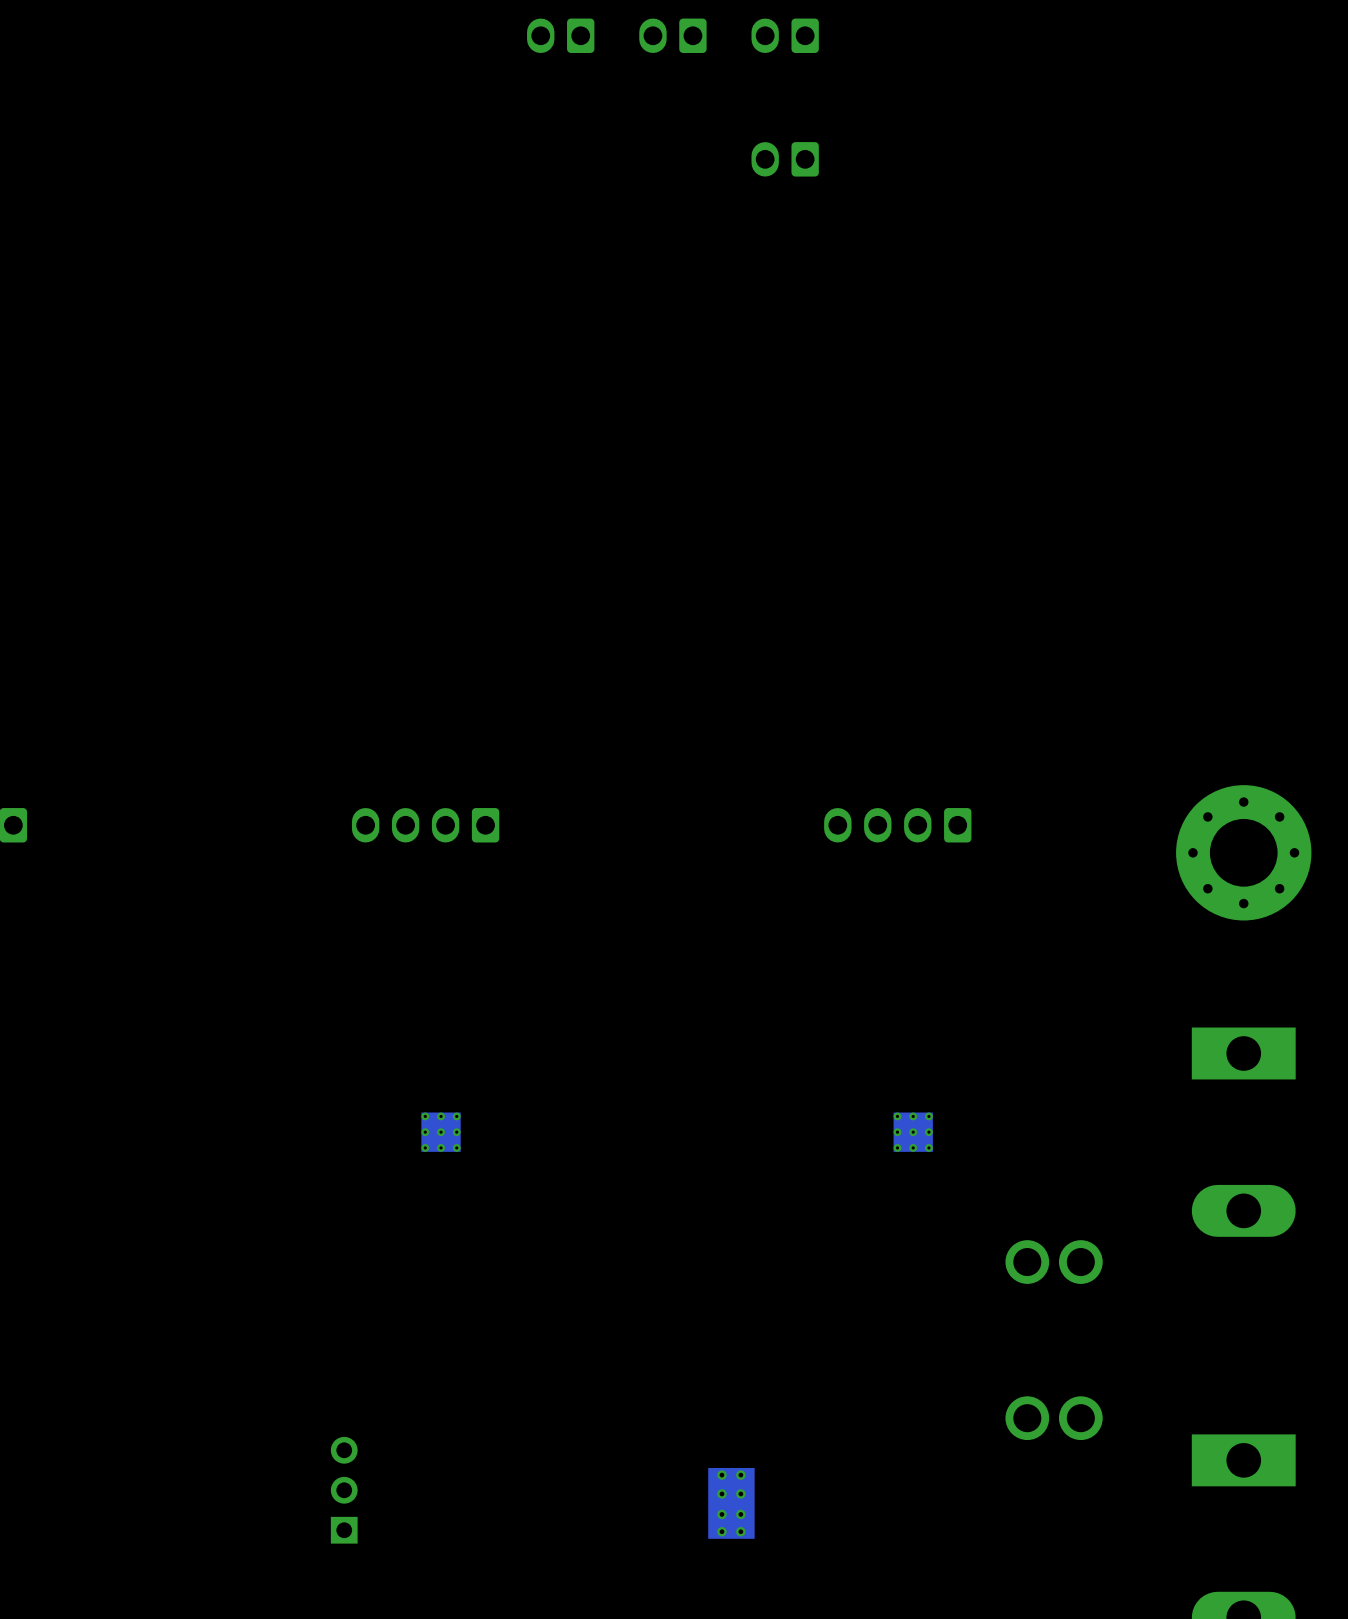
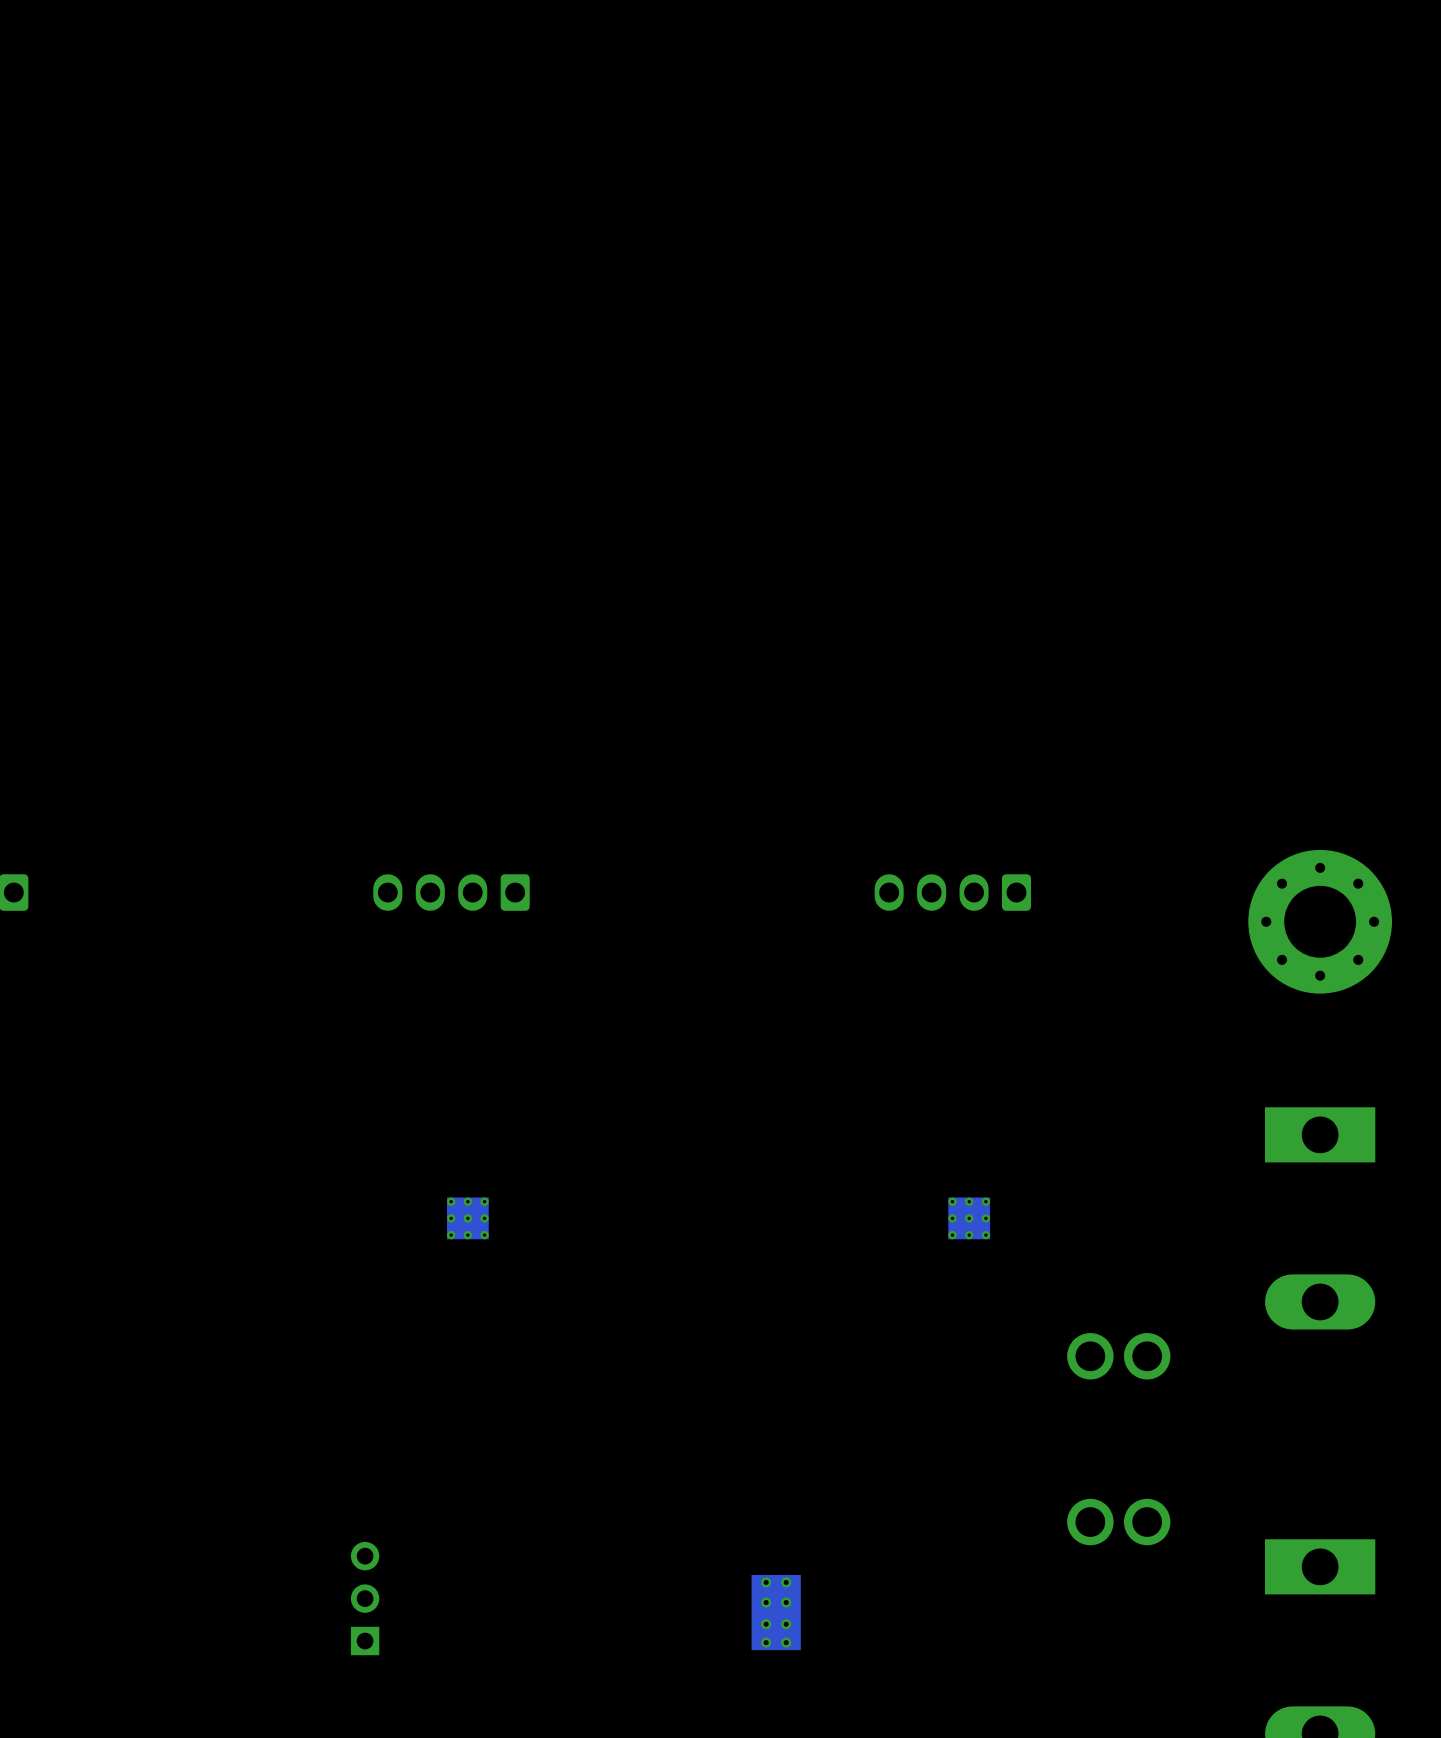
part: (560, 35) -> none
part: (672, 35) -> none
part: (785, 35) -> none
part: (785, 159) -> none

